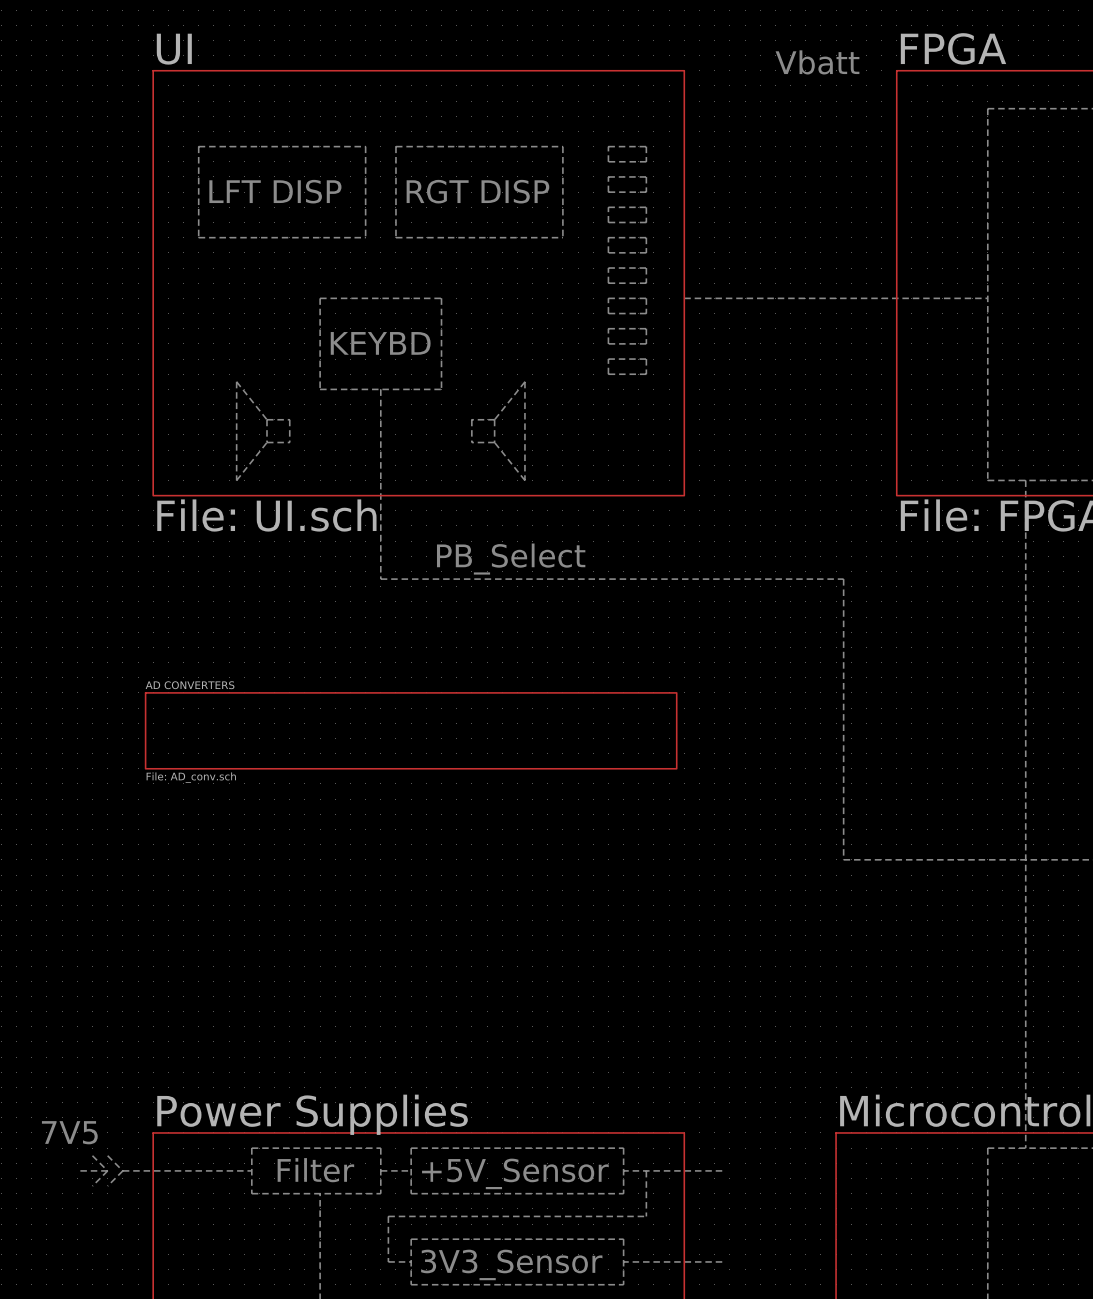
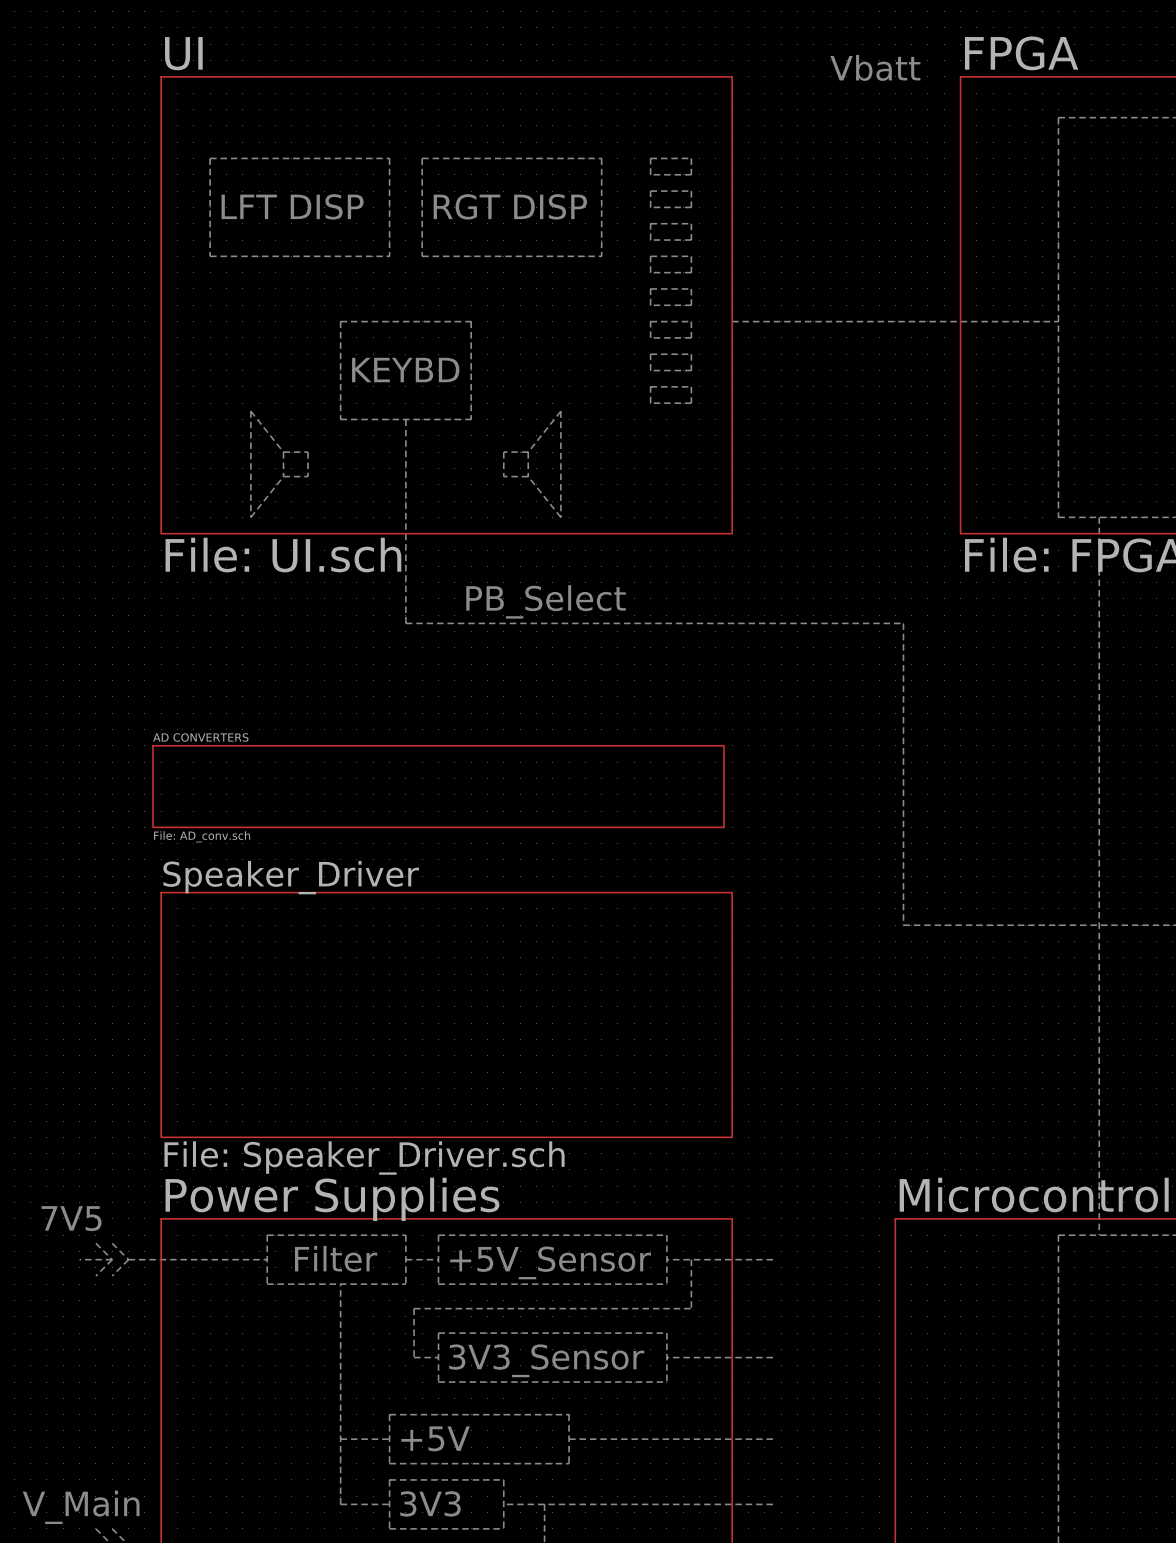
sheet Speaker_Driver: none -> File: Speaker_Driver.sch (446, 1014)

